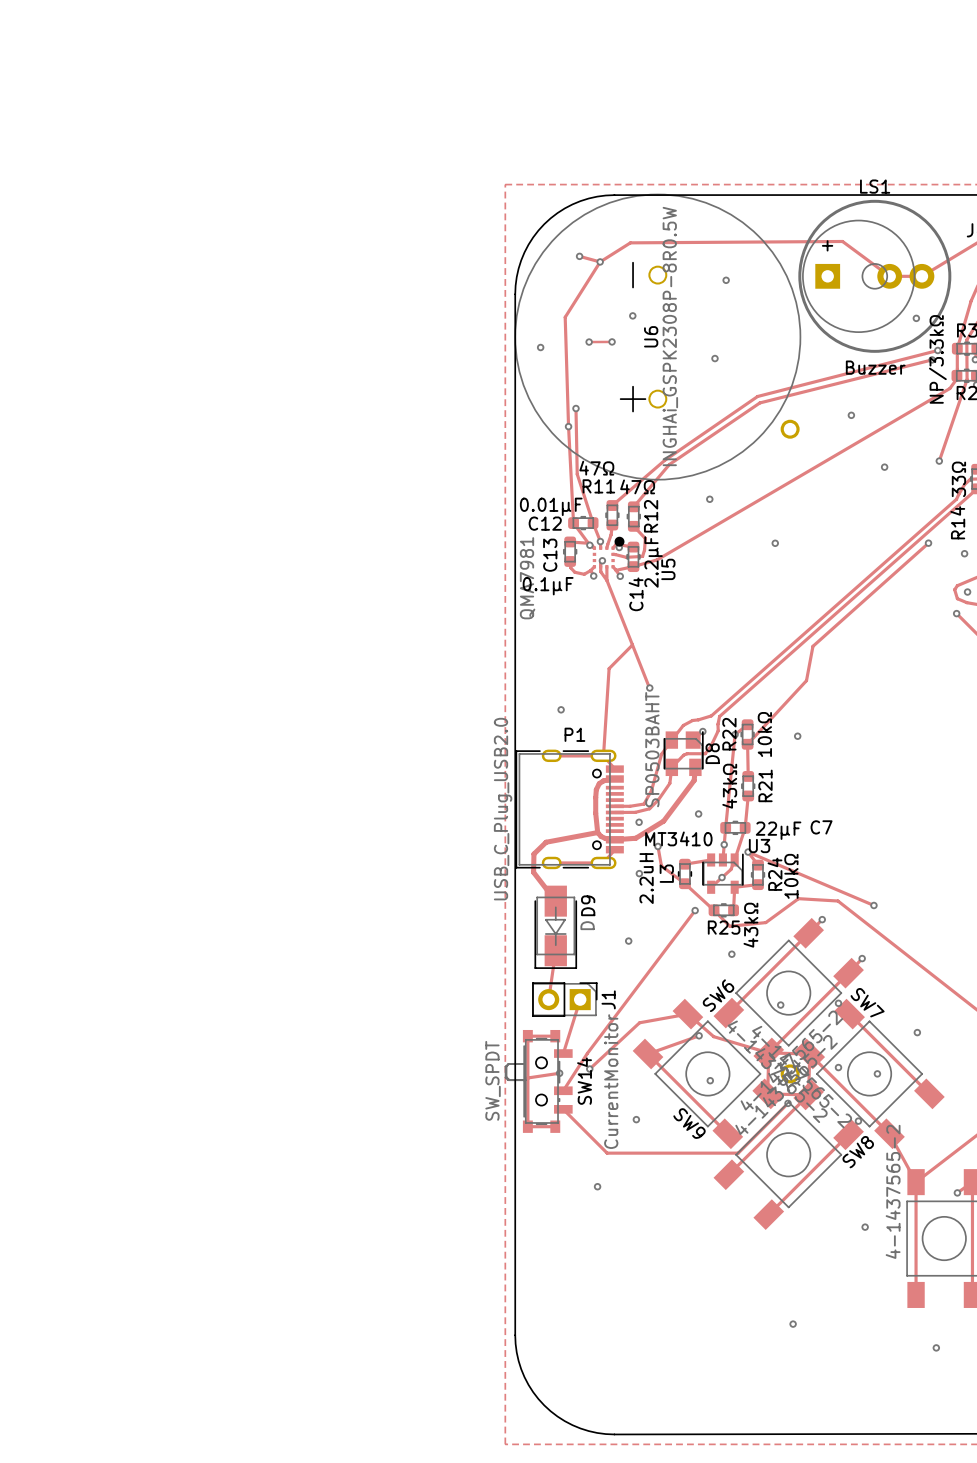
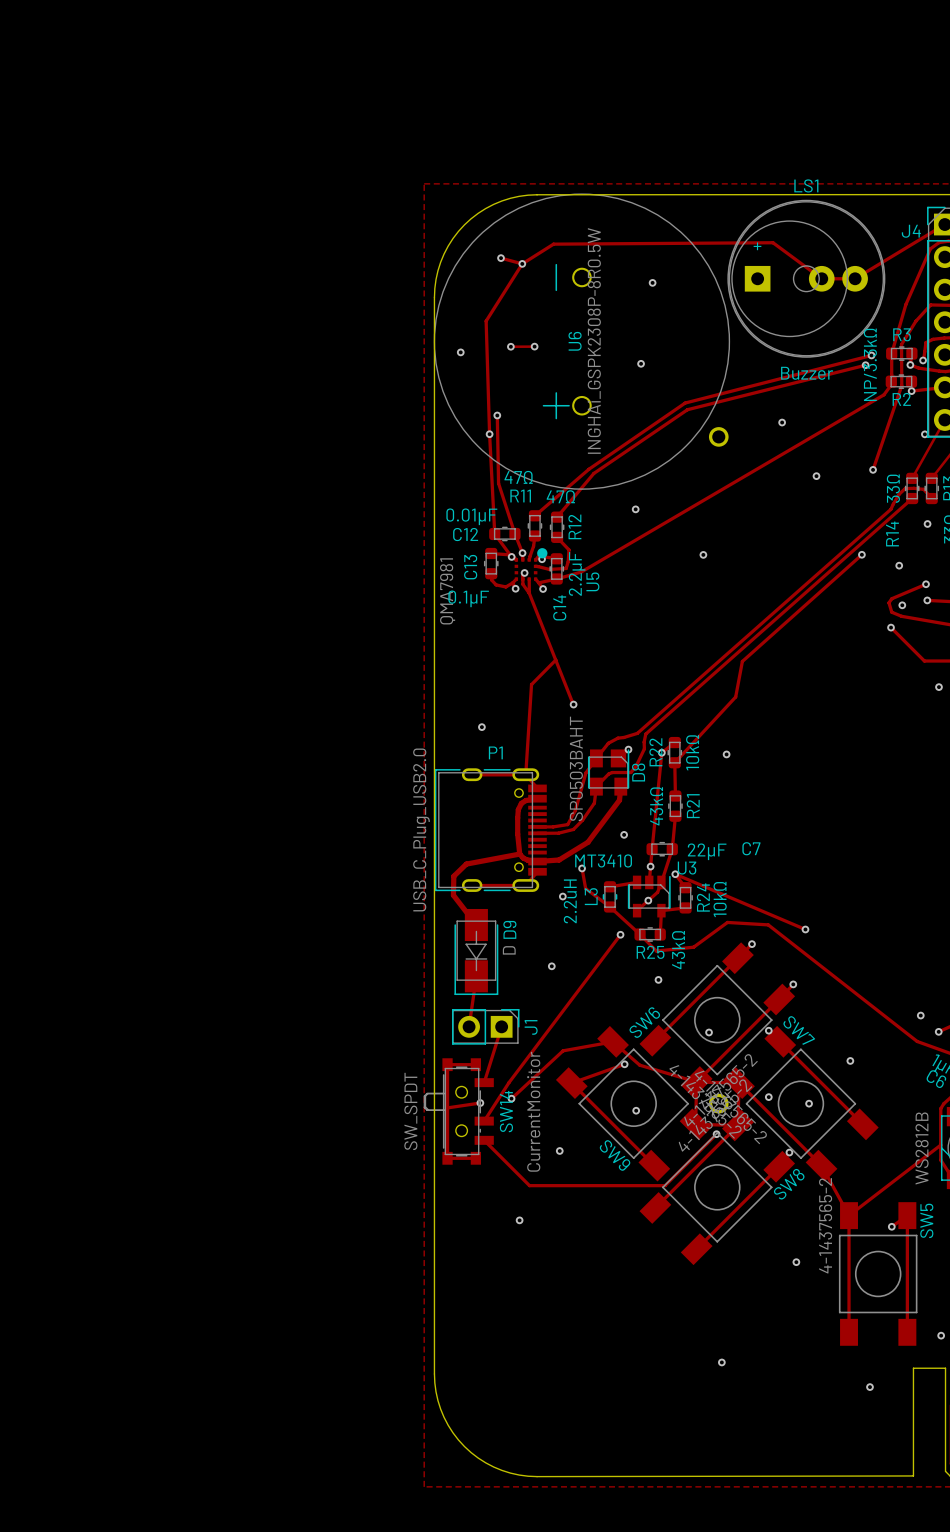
via: (632, 315) -> none
via: (916, 318) -> none
via: (639, 822) -> none

